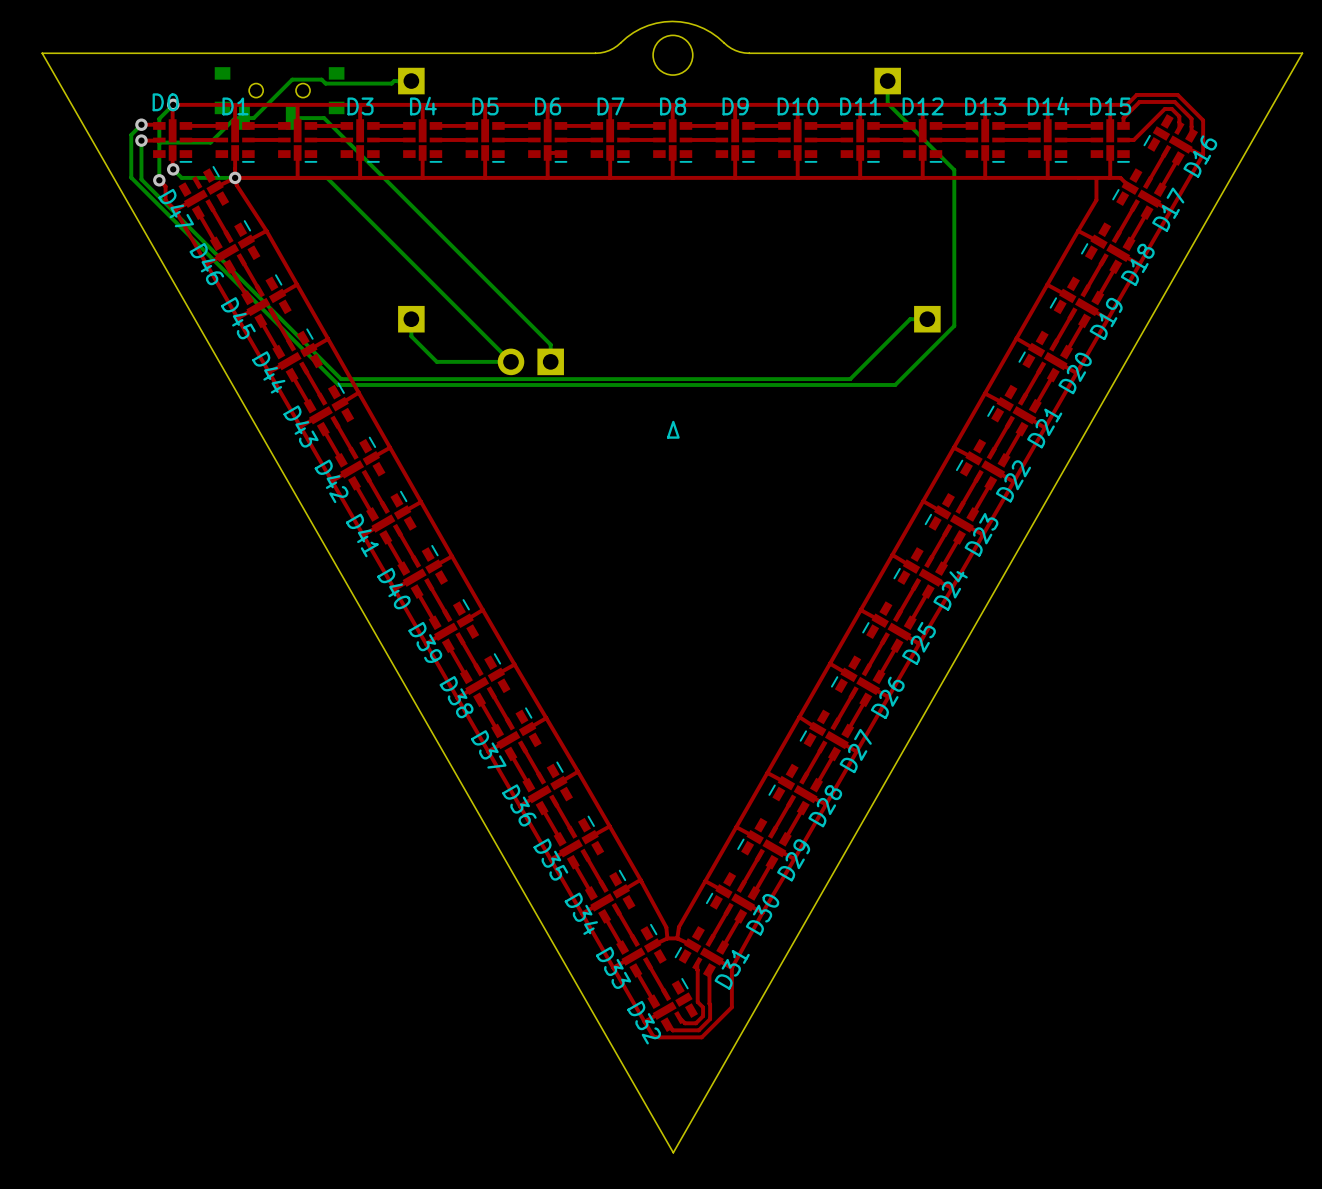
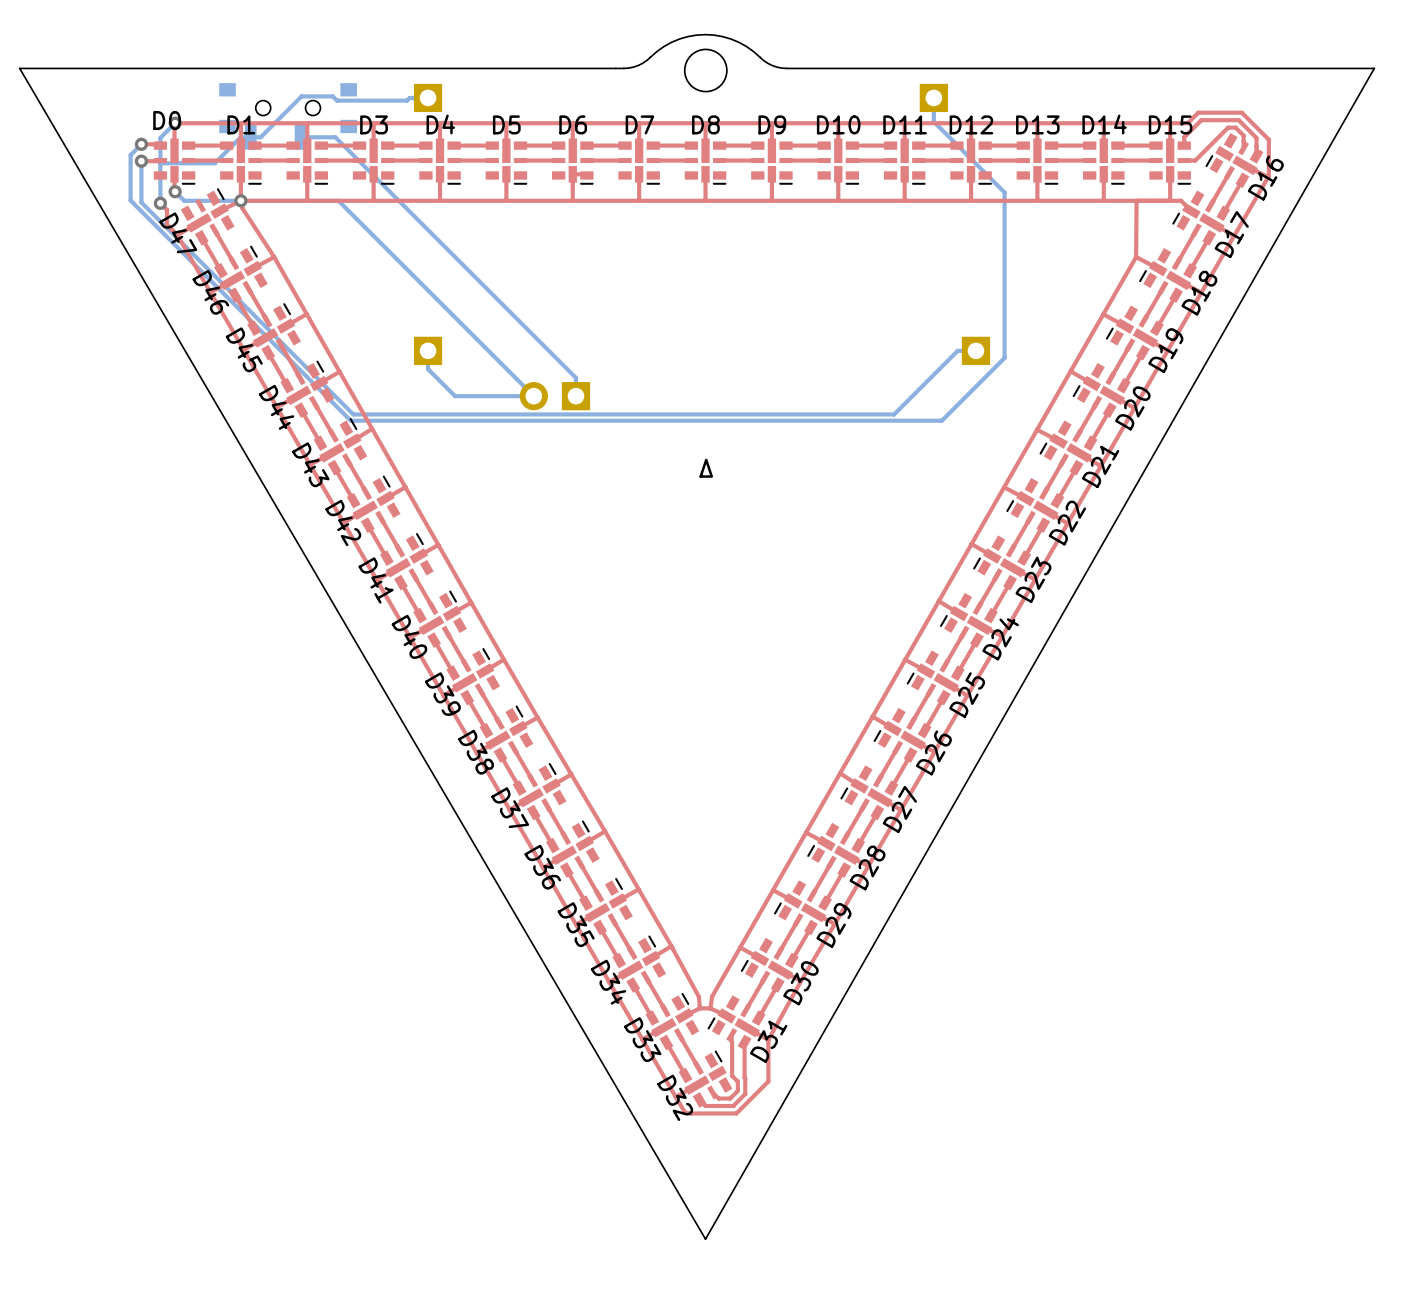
board edge: (42, 53) (673, 1152) (1302, 53) -> (36, 68) (19, 68) (705, 1239) (1374, 68)
top track: (1096, 177) (1096, 200) (1078, 230) -> (1169, 200) (1136, 200) (1136, 257)

